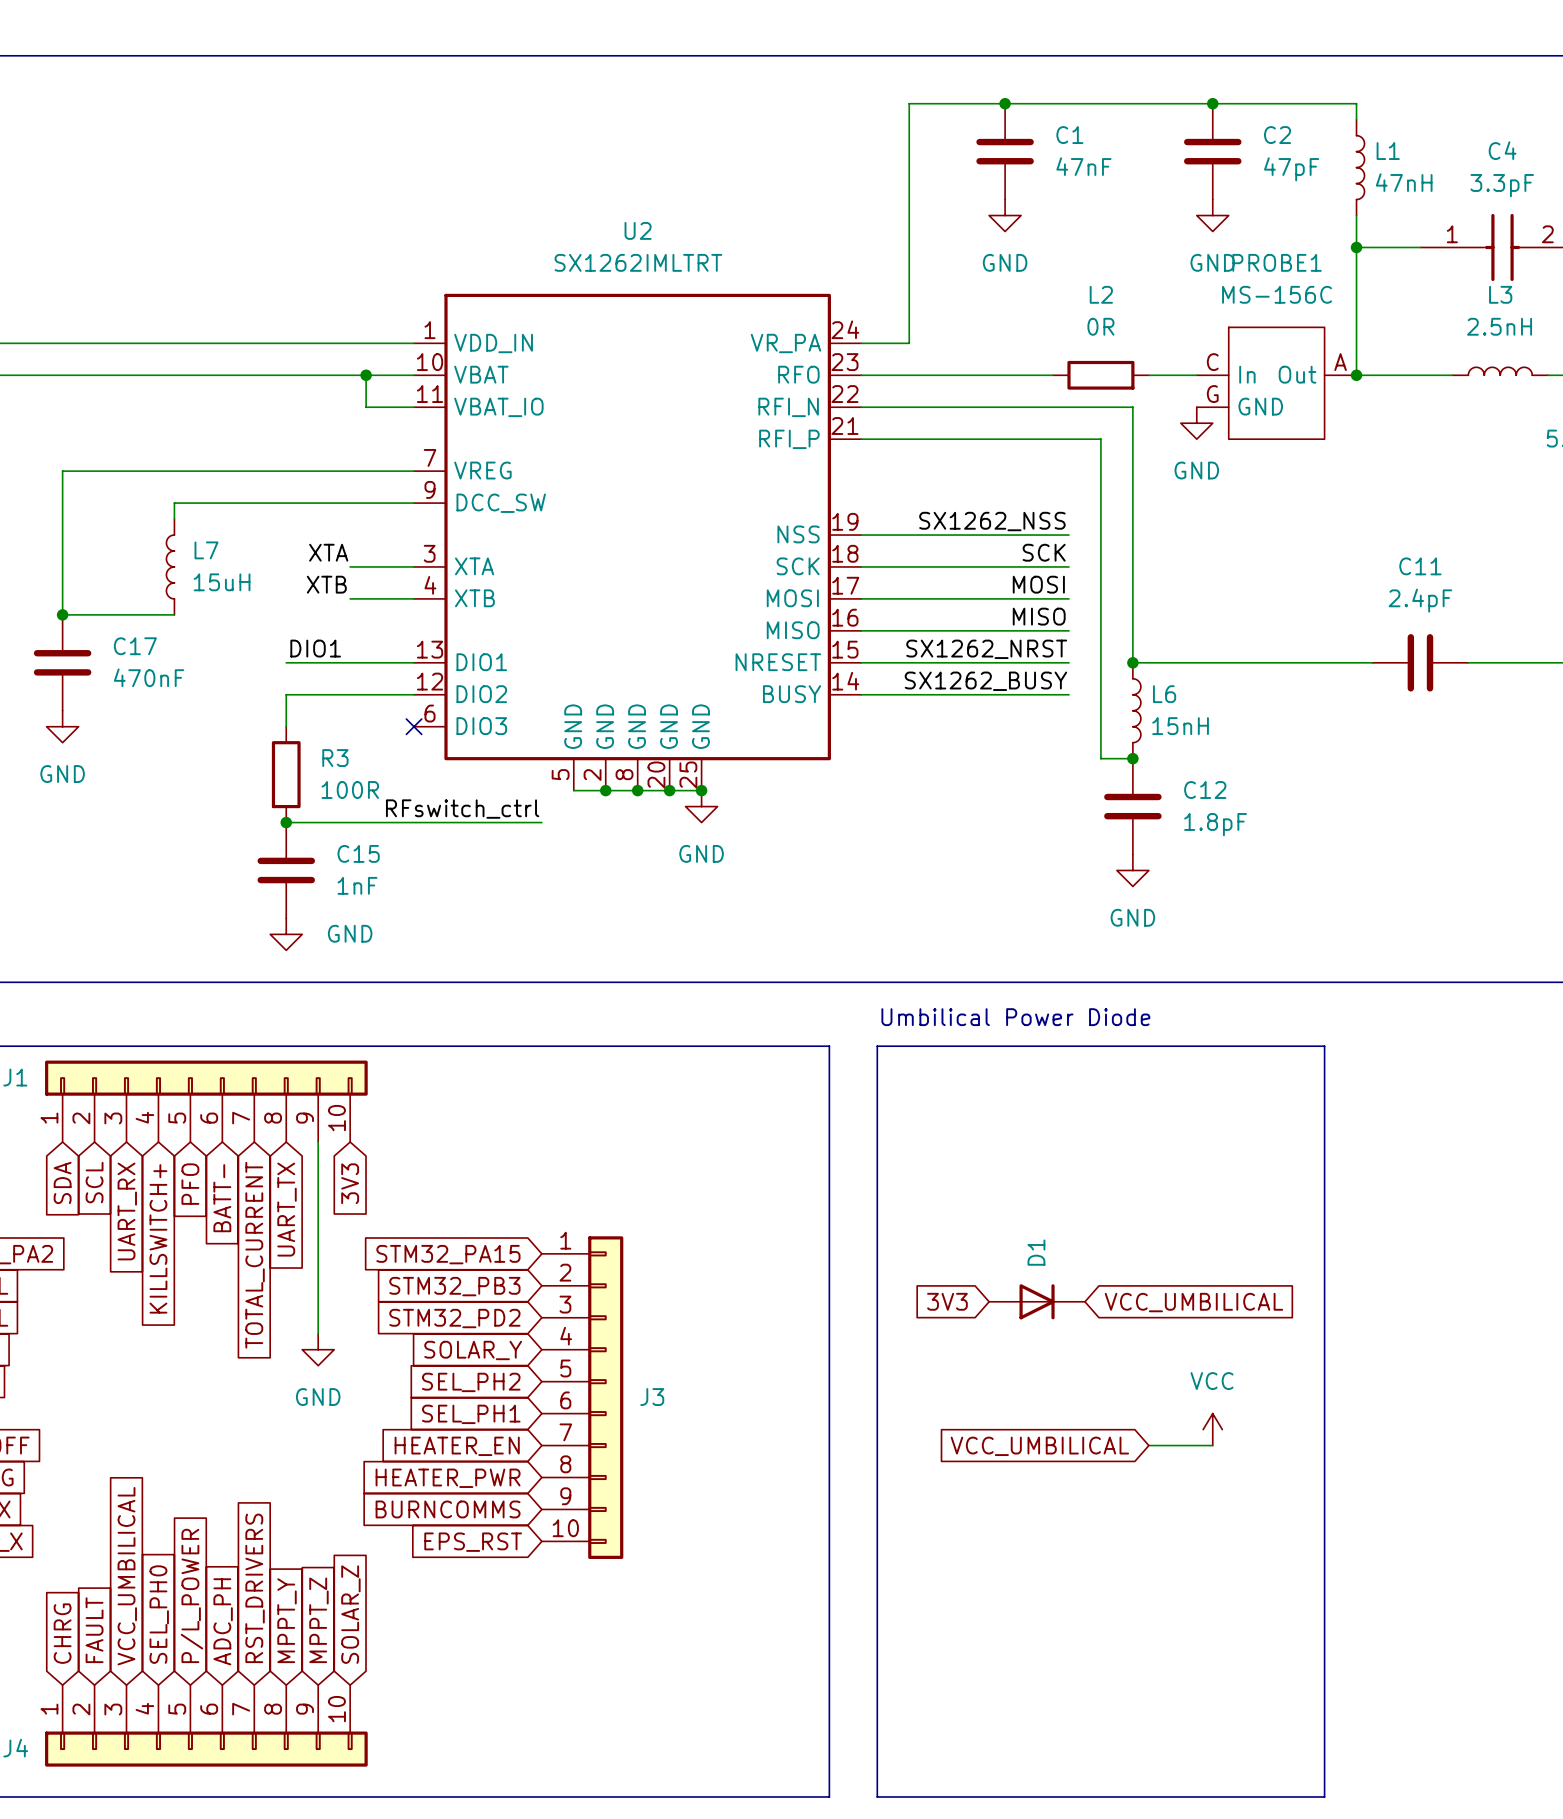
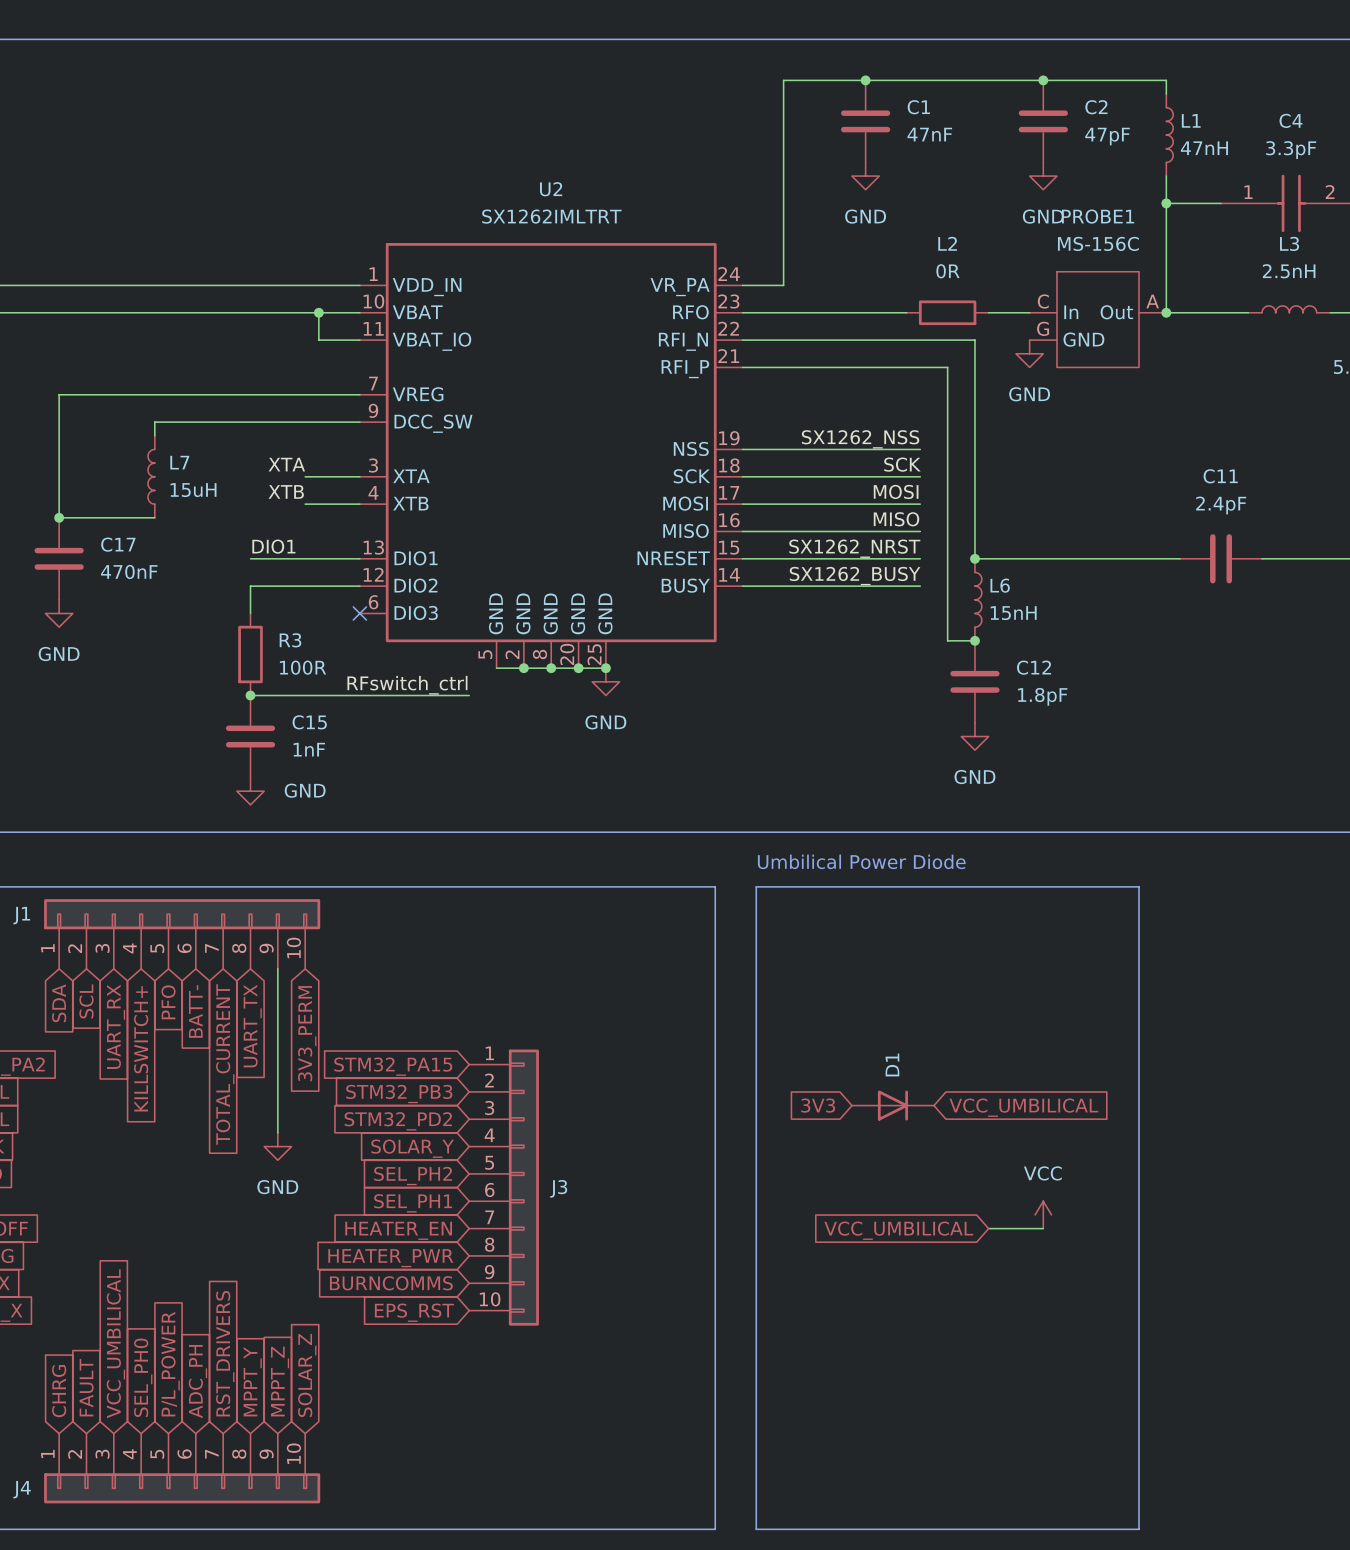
global label: 3V3 (350, 1183) -> 3V3_PERM (307, 1033)

